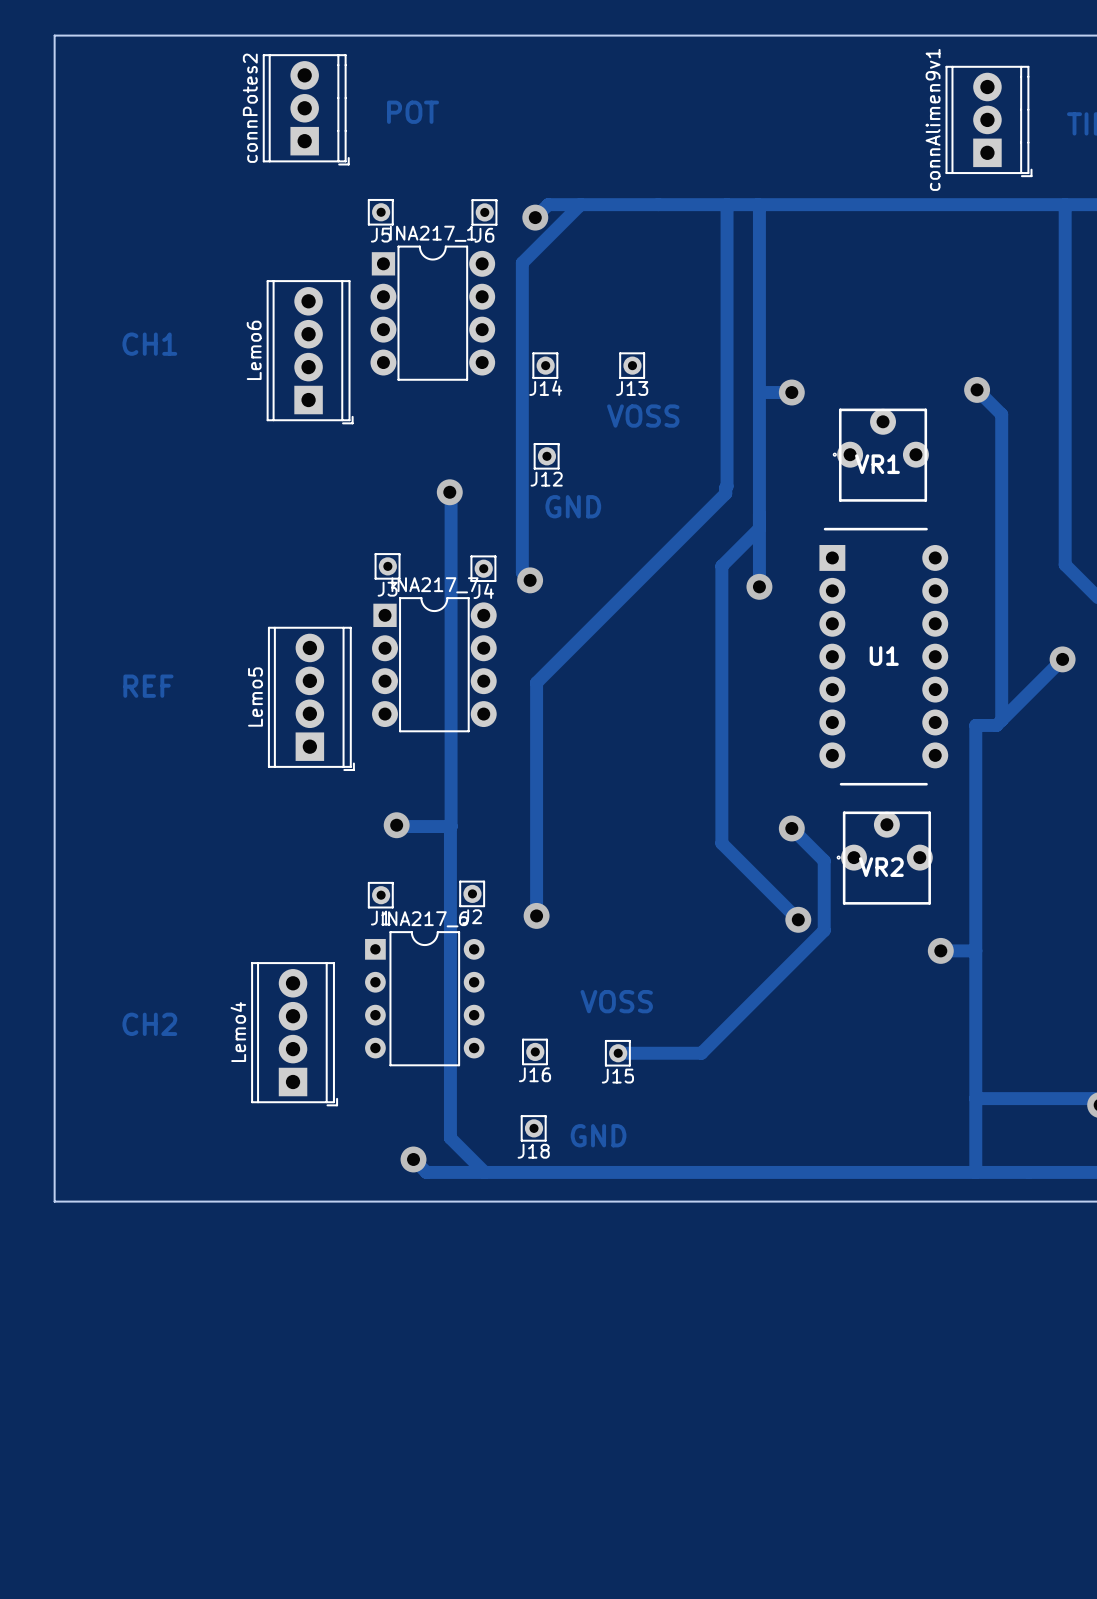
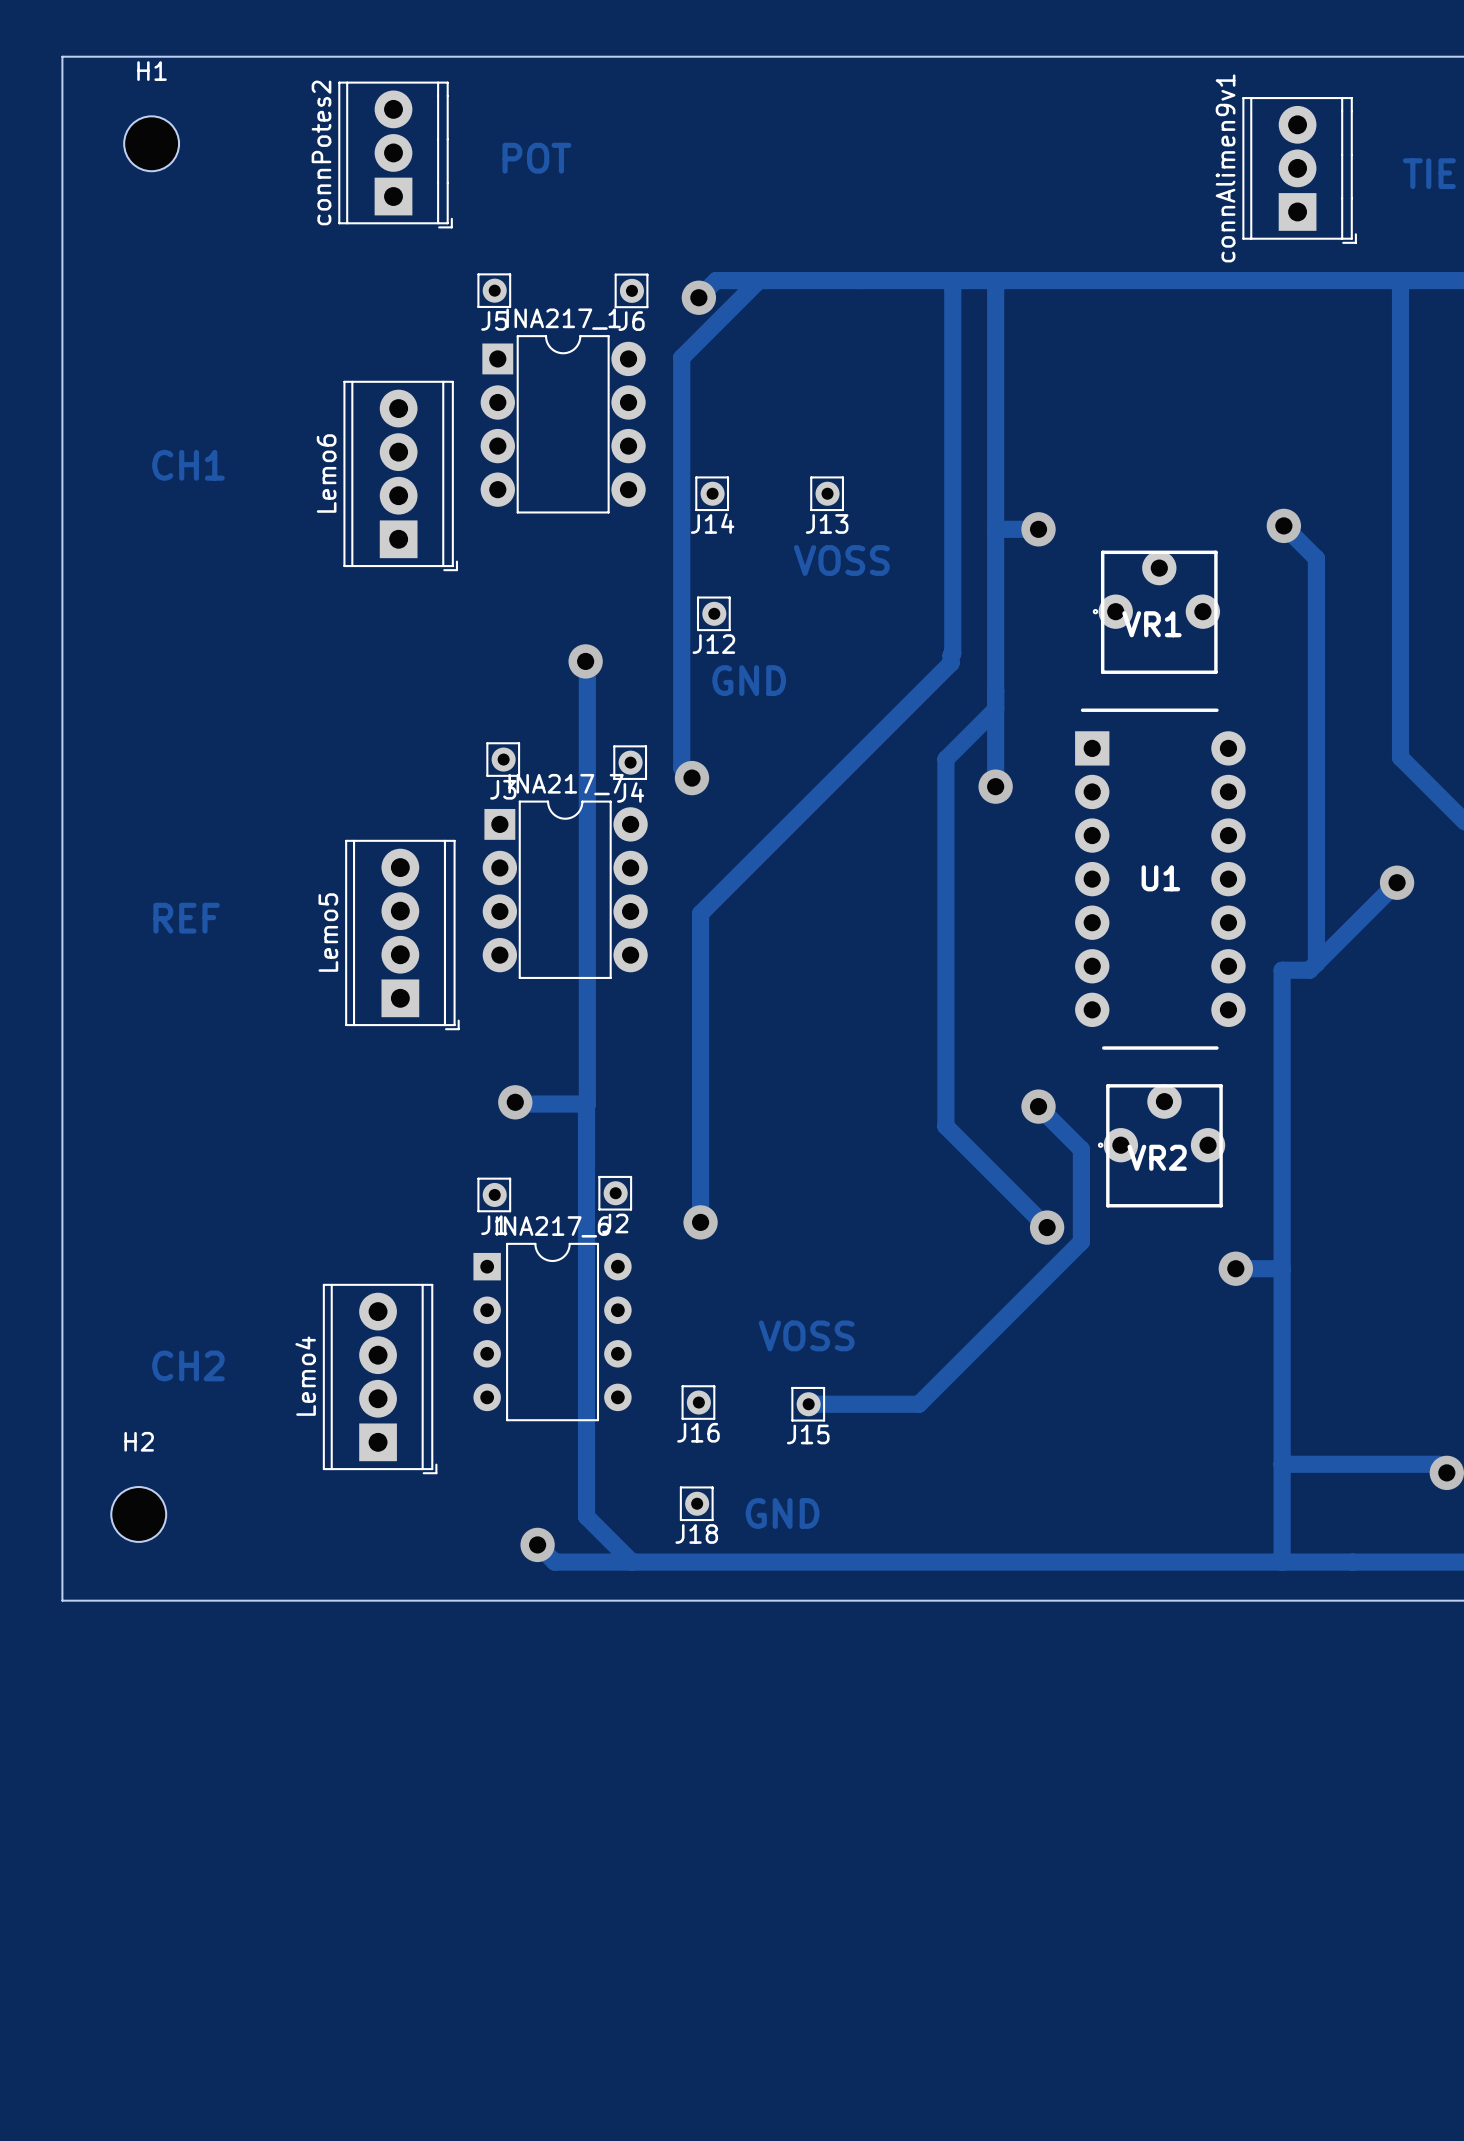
H1: none -> (151, 143)
H2: none -> (138, 1514)

